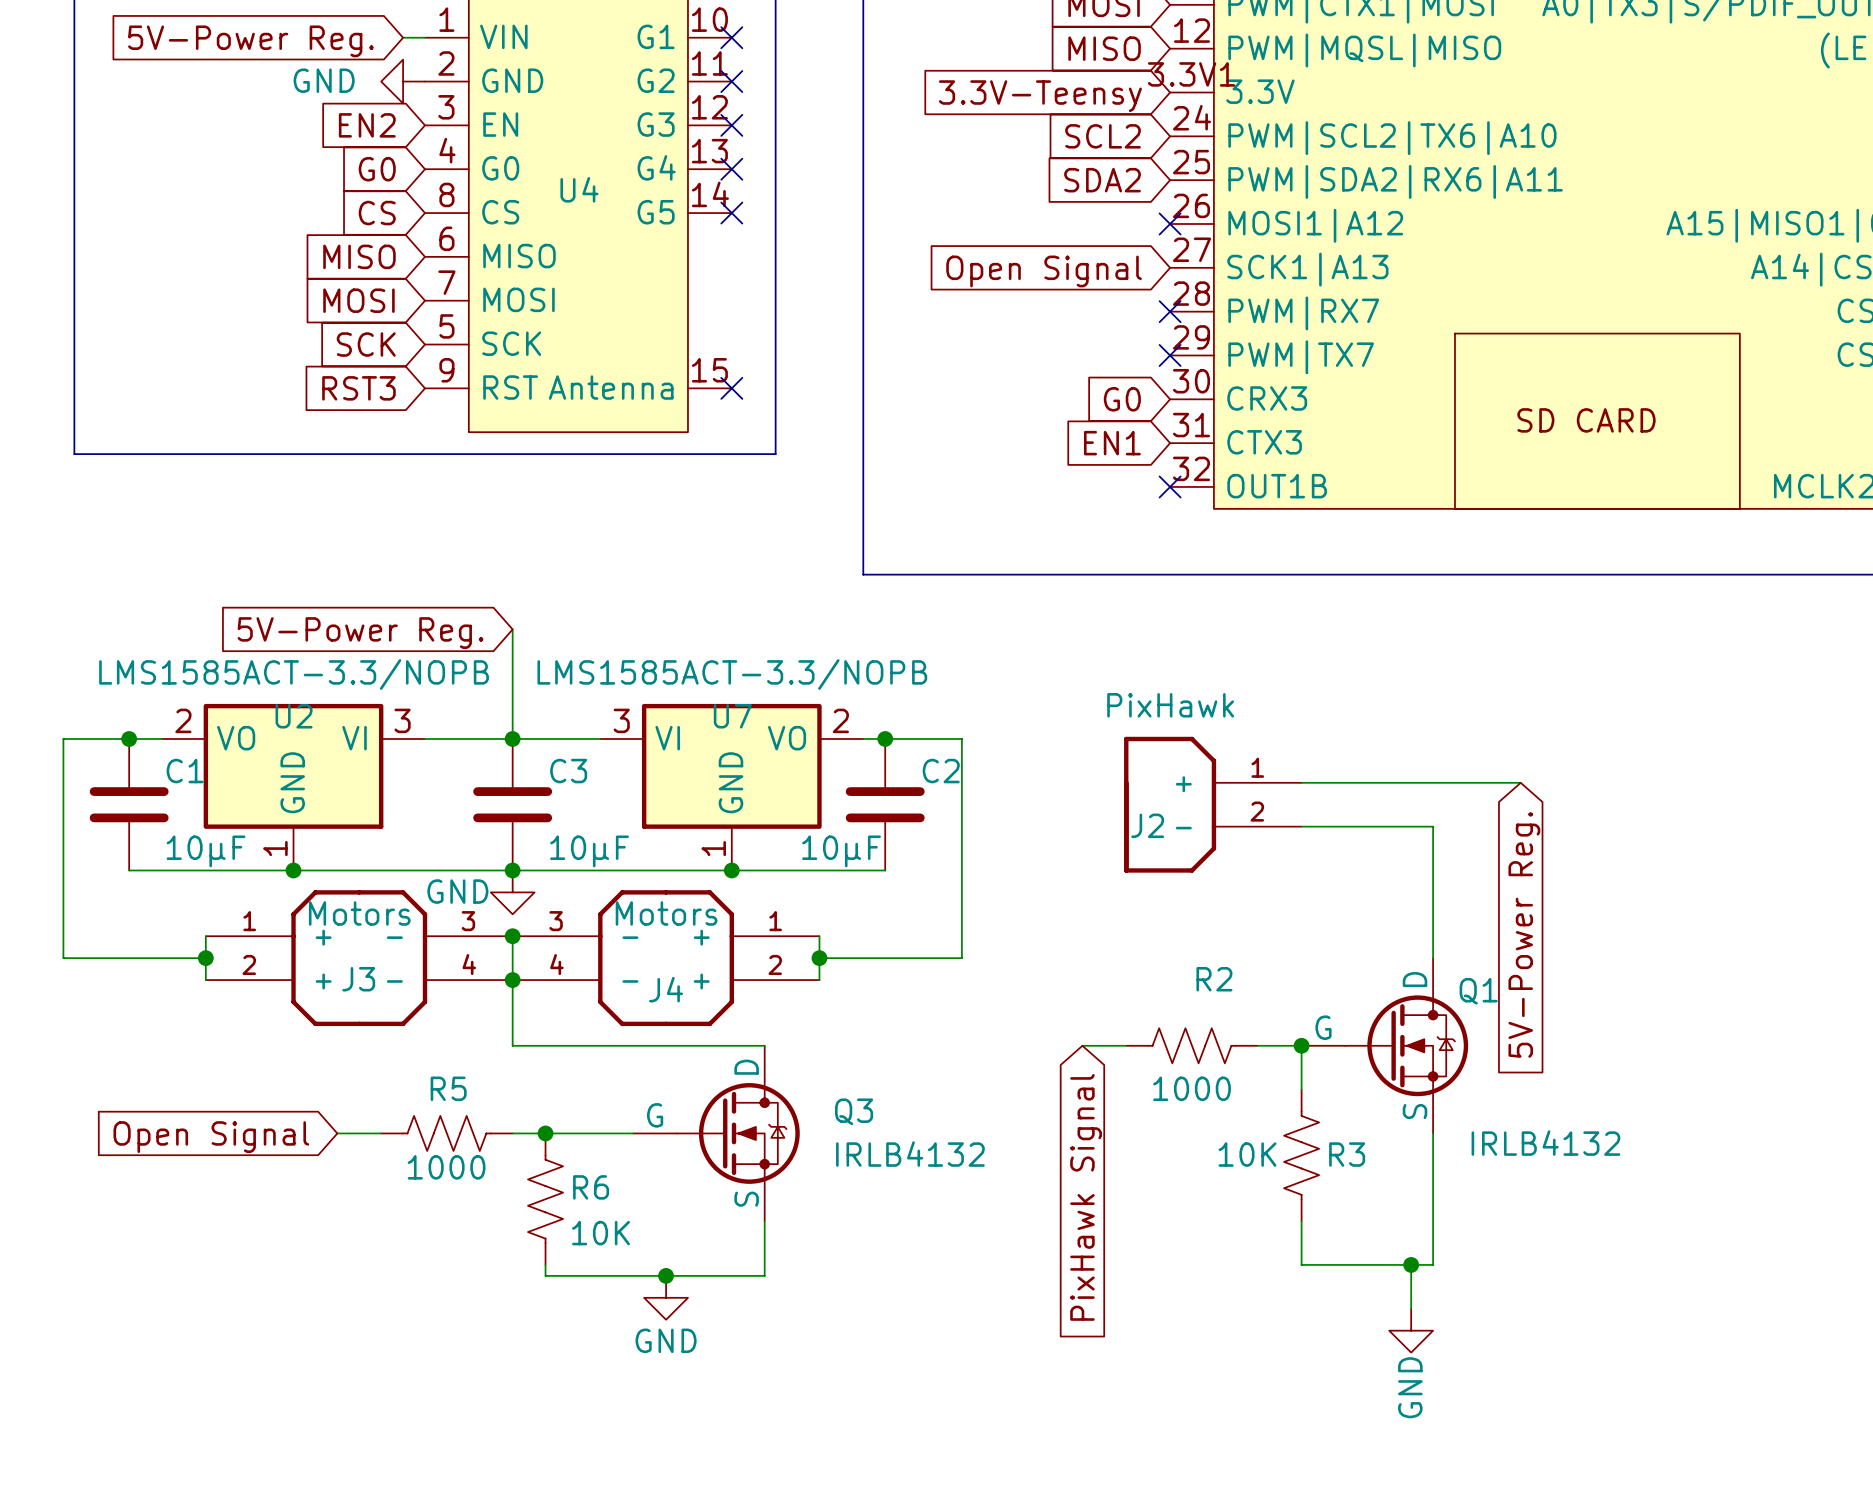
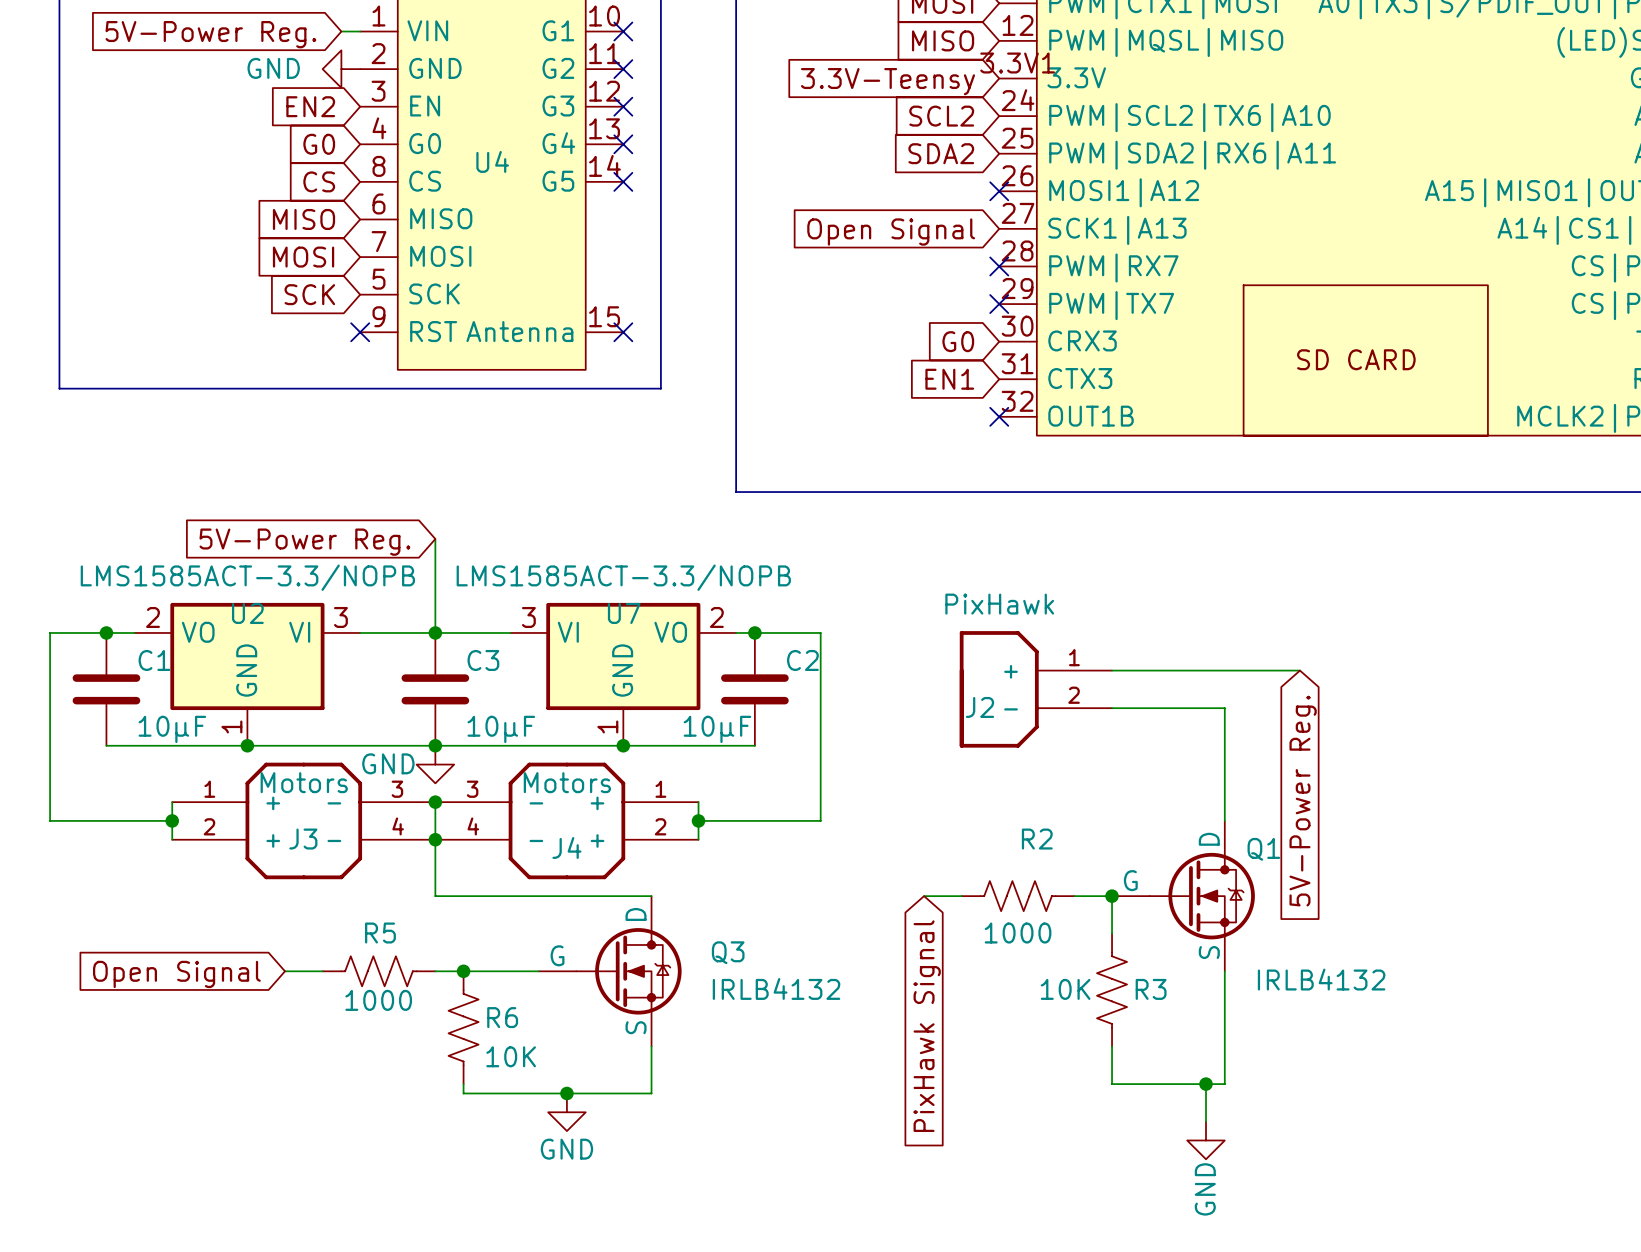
global label: RST3 (358, 388) -> none
no-connect mark: none -> (360, 332)

